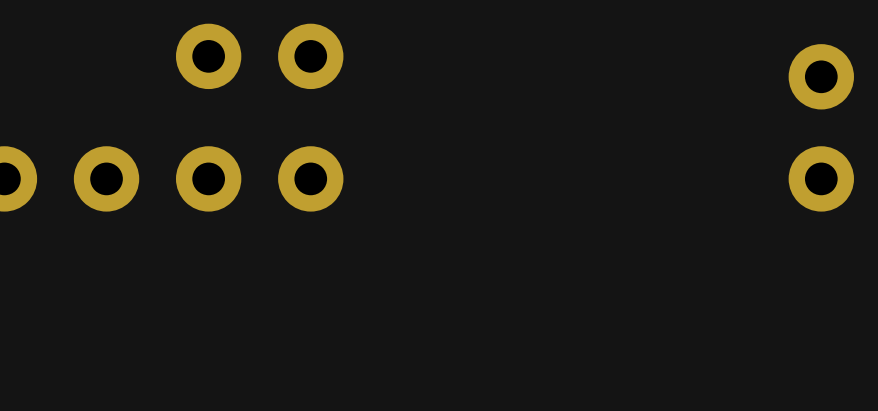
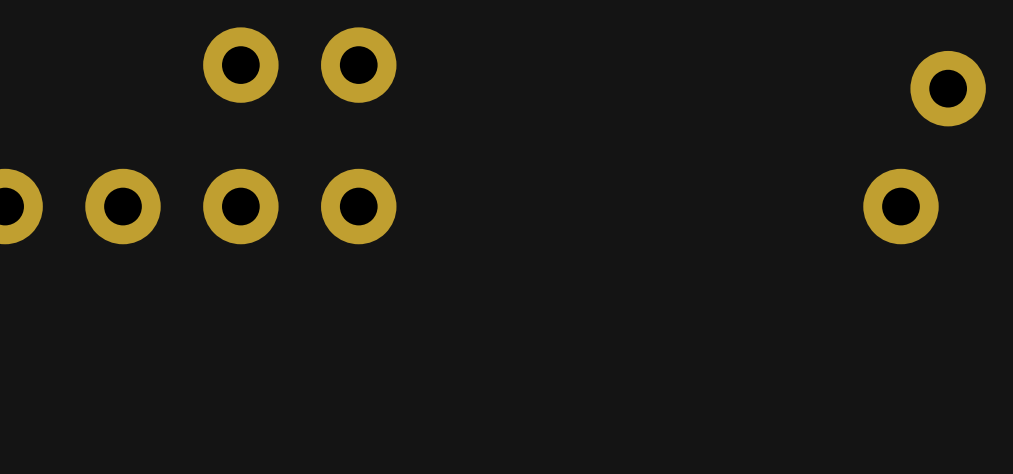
via position: (821, 178) -> (900, 206)

